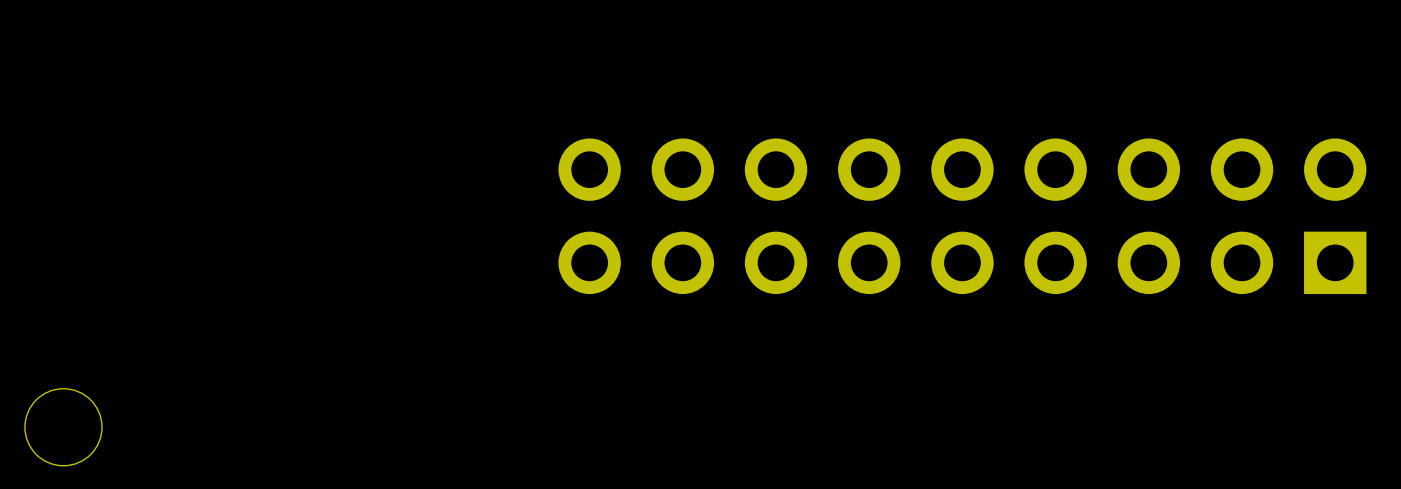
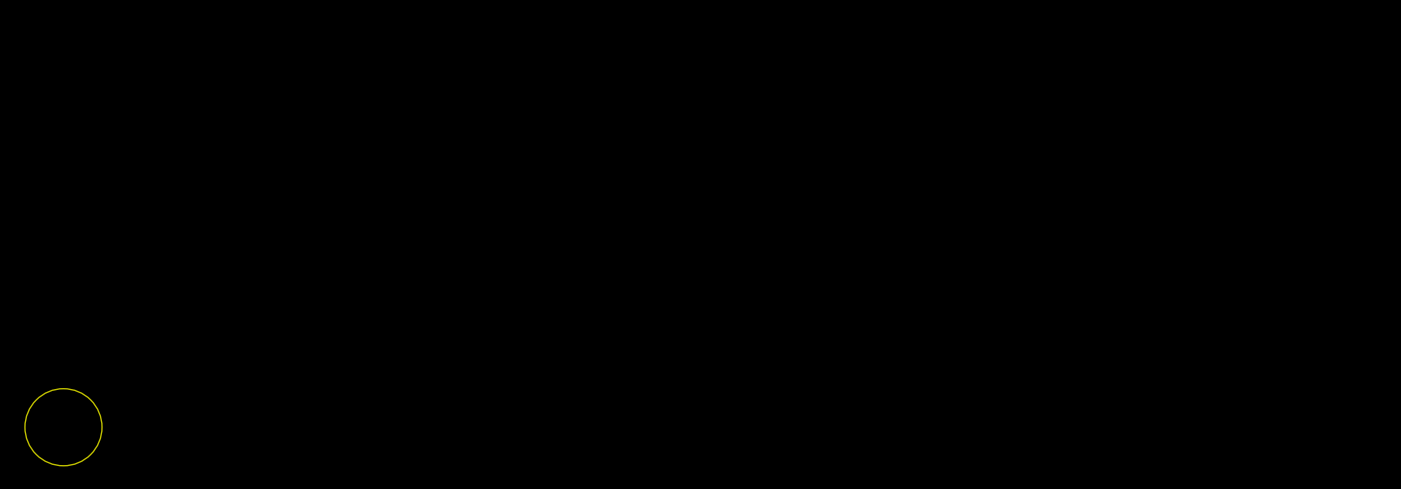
part: (962, 216) -> none

